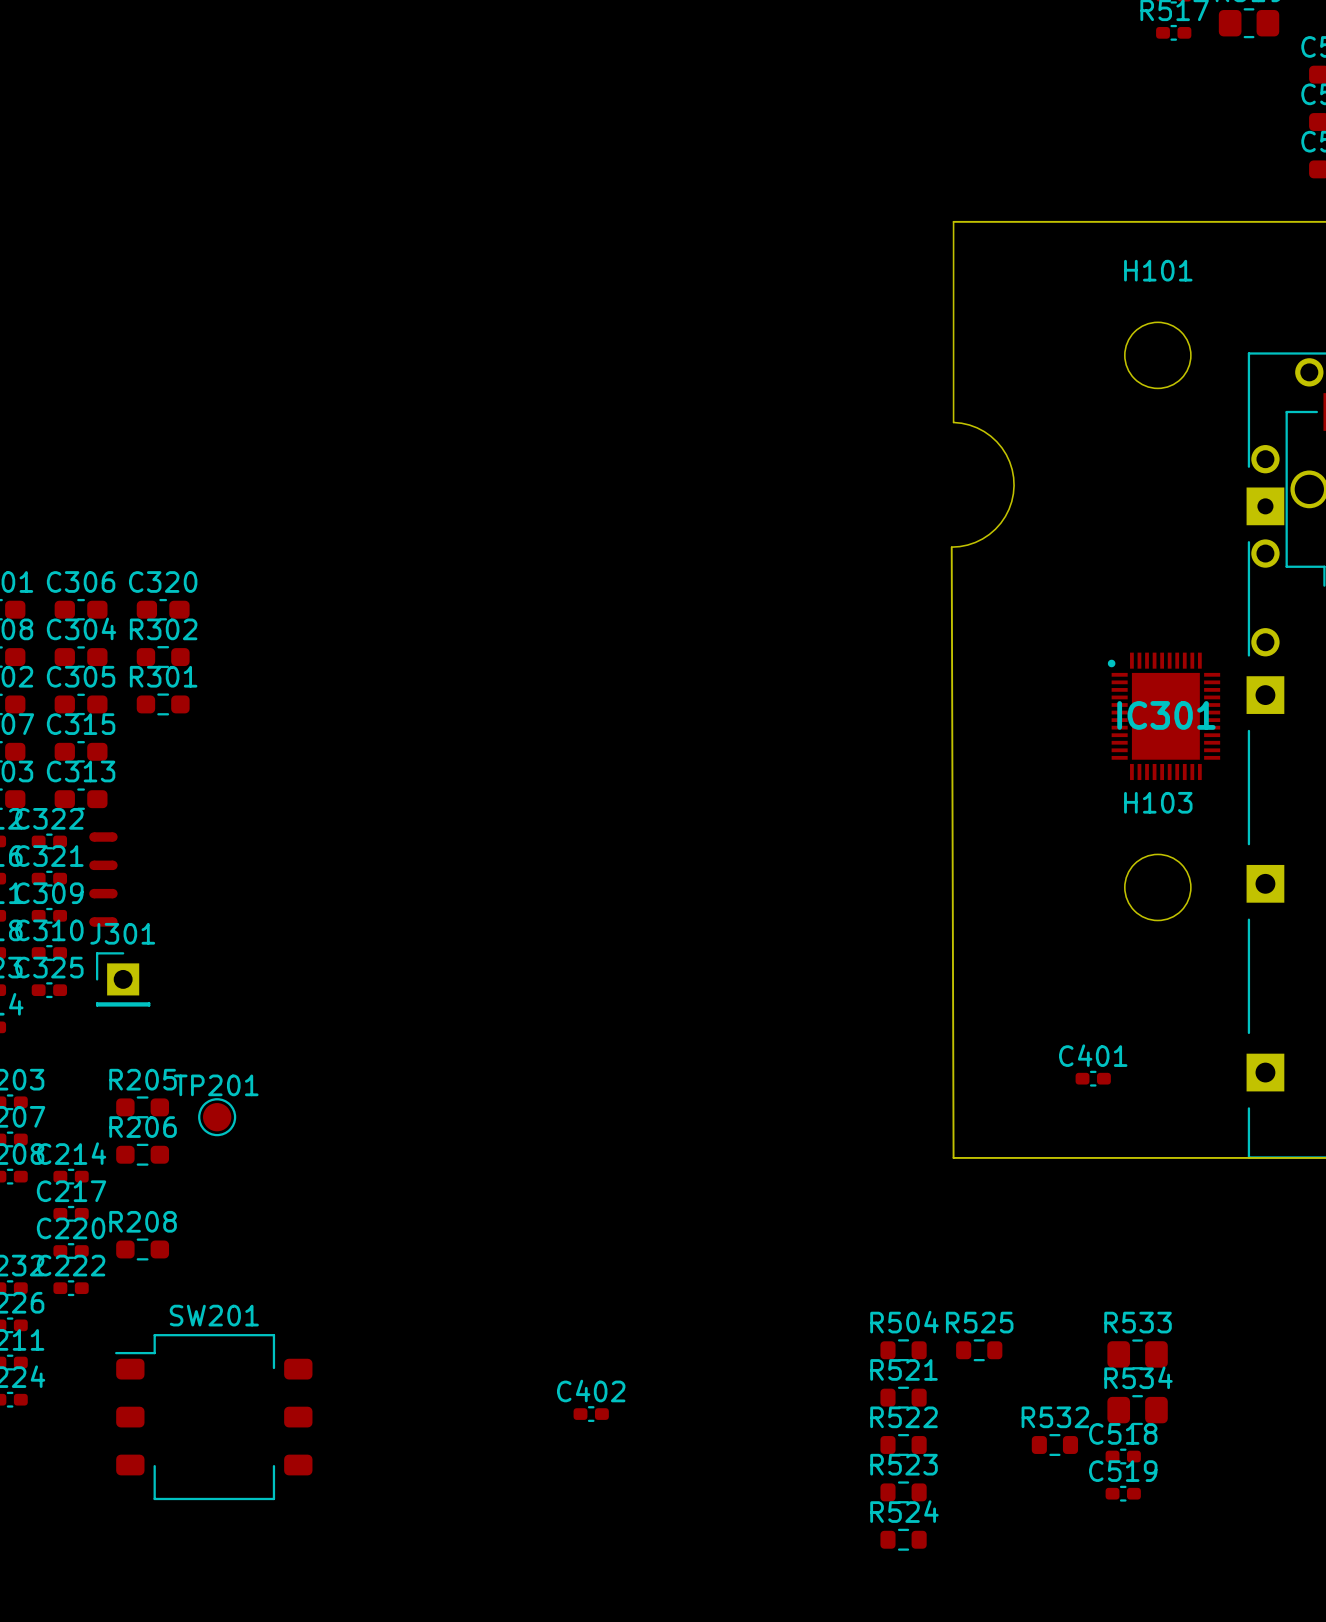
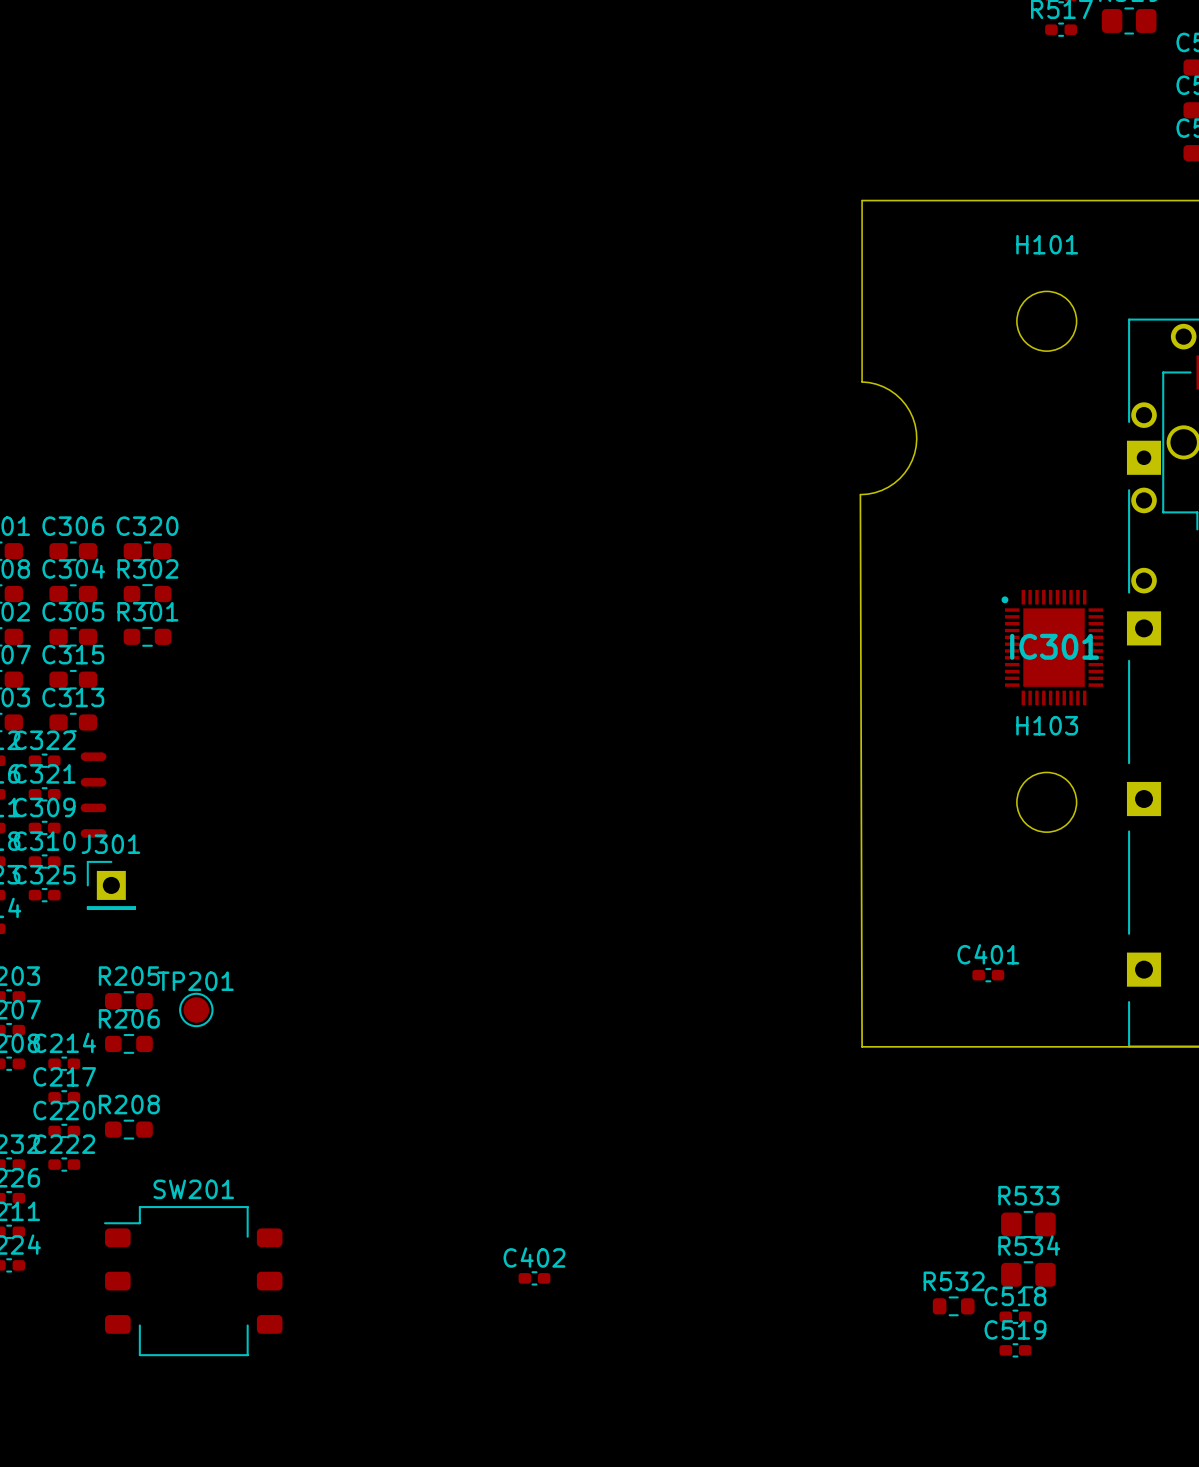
R504: (903, 1350) -> none
R525: (979, 1350) -> none
R521: (903, 1397) -> none
R522: (903, 1445) -> none
R523: (903, 1492) -> none
R524: (903, 1539) -> none

